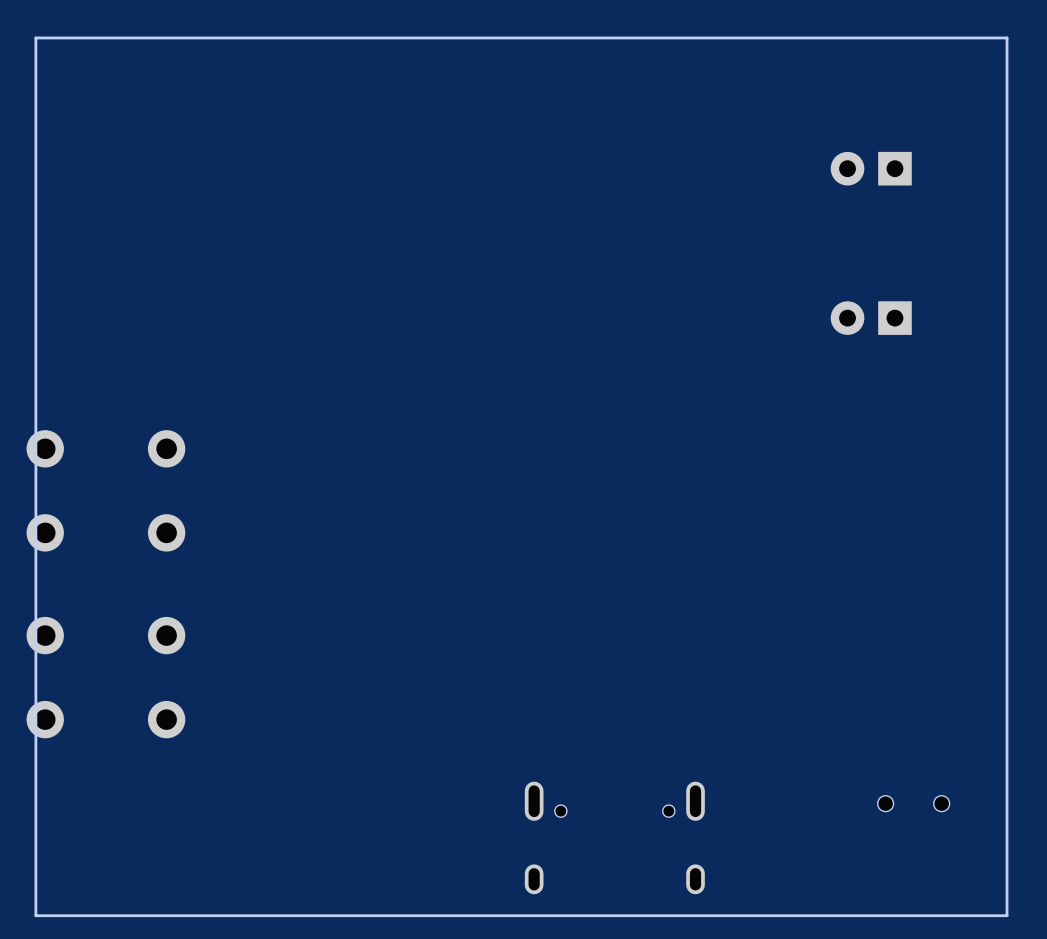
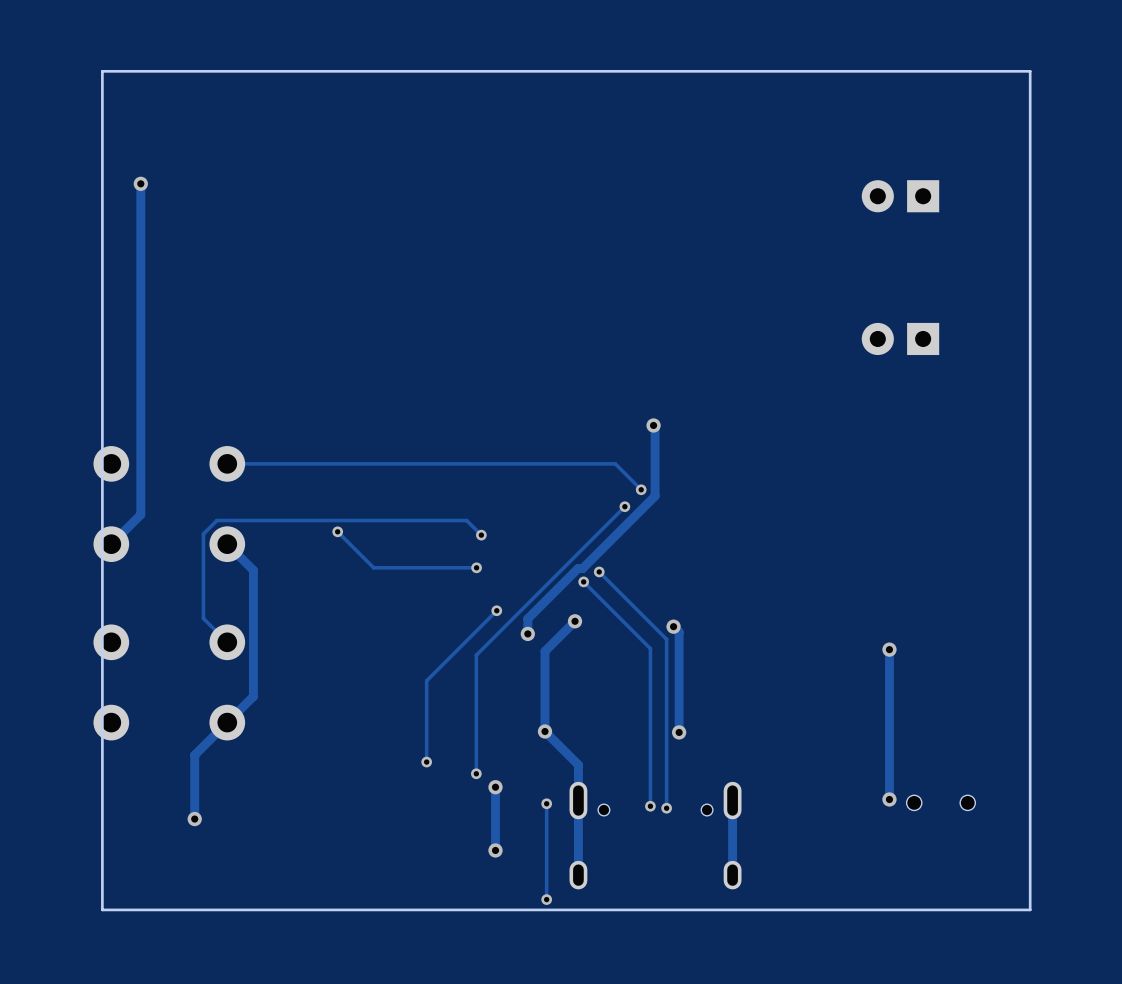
track: none -> (140, 183) (140, 514) (111, 544)
via: none -> (140, 183)
track: none -> (653, 425) (655, 496) (582, 568) (578, 568) (527, 618) (527, 633)
via: none -> (653, 425)
track: none -> (227, 463) (615, 463) (641, 489)
via: none -> (641, 489)
track: none -> (624, 506) (476, 655) (476, 773)
via: none -> (624, 506)
track: none -> (337, 531) (373, 567) (476, 567)
via: none -> (337, 531)
track: none -> (481, 535) (466, 520) (216, 520) (203, 534) (203, 618) (227, 642)
via: none -> (481, 535)
track: none -> (227, 544) (253, 570) (253, 696) (194, 755) (194, 819)
via: none -> (476, 567)
track: none -> (599, 571) (666, 639) (666, 808)
via: none -> (599, 571)
track: none -> (583, 581) (650, 648) (650, 806)
via: none -> (583, 581)
track: none -> (496, 610) (426, 680) (426, 762)
via: none -> (496, 610)
track: none -> (575, 621) (545, 651) (545, 731) (578, 764) (578, 875)
via: none -> (575, 621)
track: none -> (673, 626) (679, 632) (679, 732)
via: none -> (673, 626)
via: none -> (527, 633)
track: none -> (889, 649) (889, 799)
via: none -> (889, 649)
via: none -> (545, 731)
via: none -> (679, 732)
via: none -> (426, 762)
via: none -> (476, 773)
track: none -> (495, 787) (495, 850)
via: none -> (495, 787)
via: none -> (889, 799)
track: none -> (732, 800) (732, 875)
track: none -> (546, 803) (546, 899)
via: none -> (546, 803)
via: none -> (650, 806)
via: none -> (666, 808)
via: none -> (194, 819)
via: none -> (495, 850)
via: none -> (546, 899)

